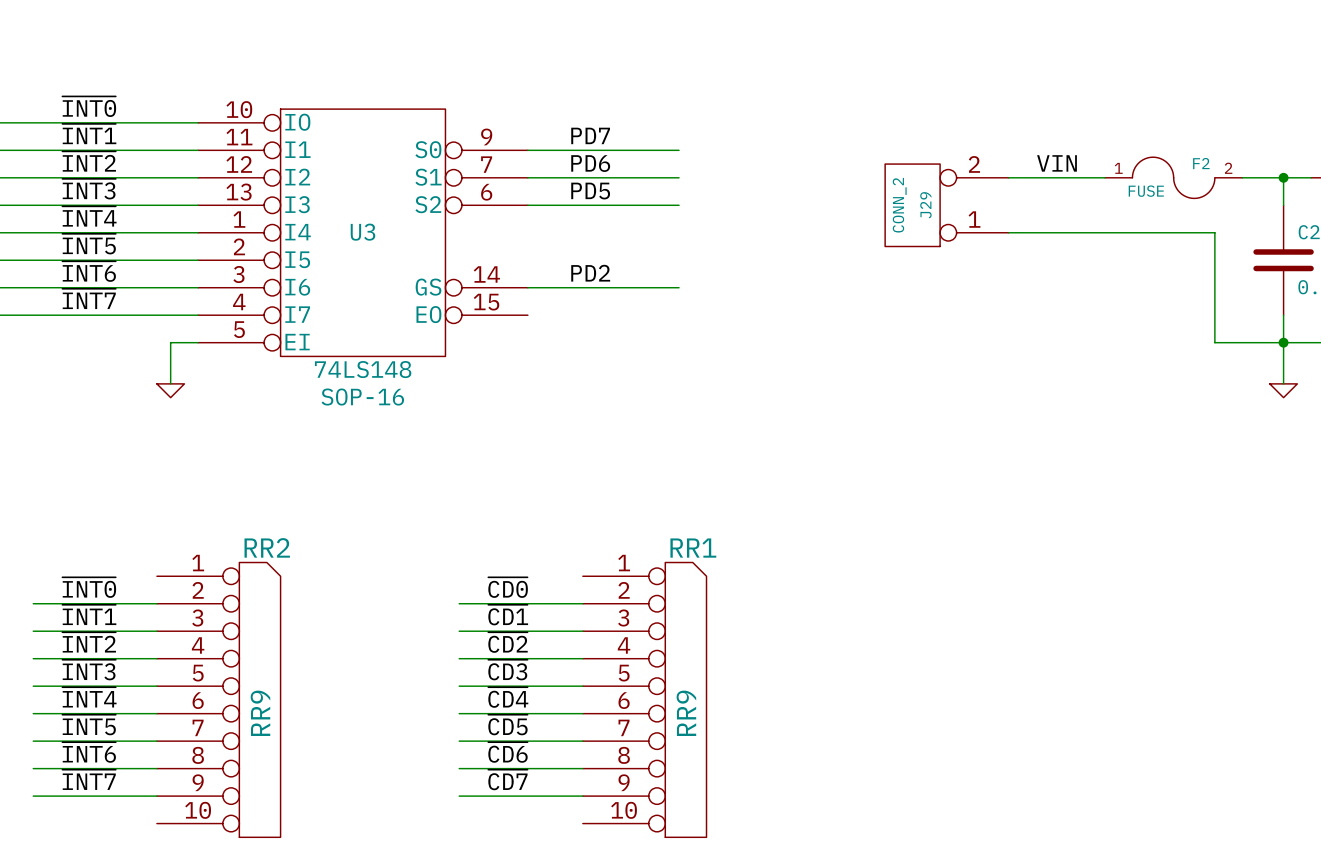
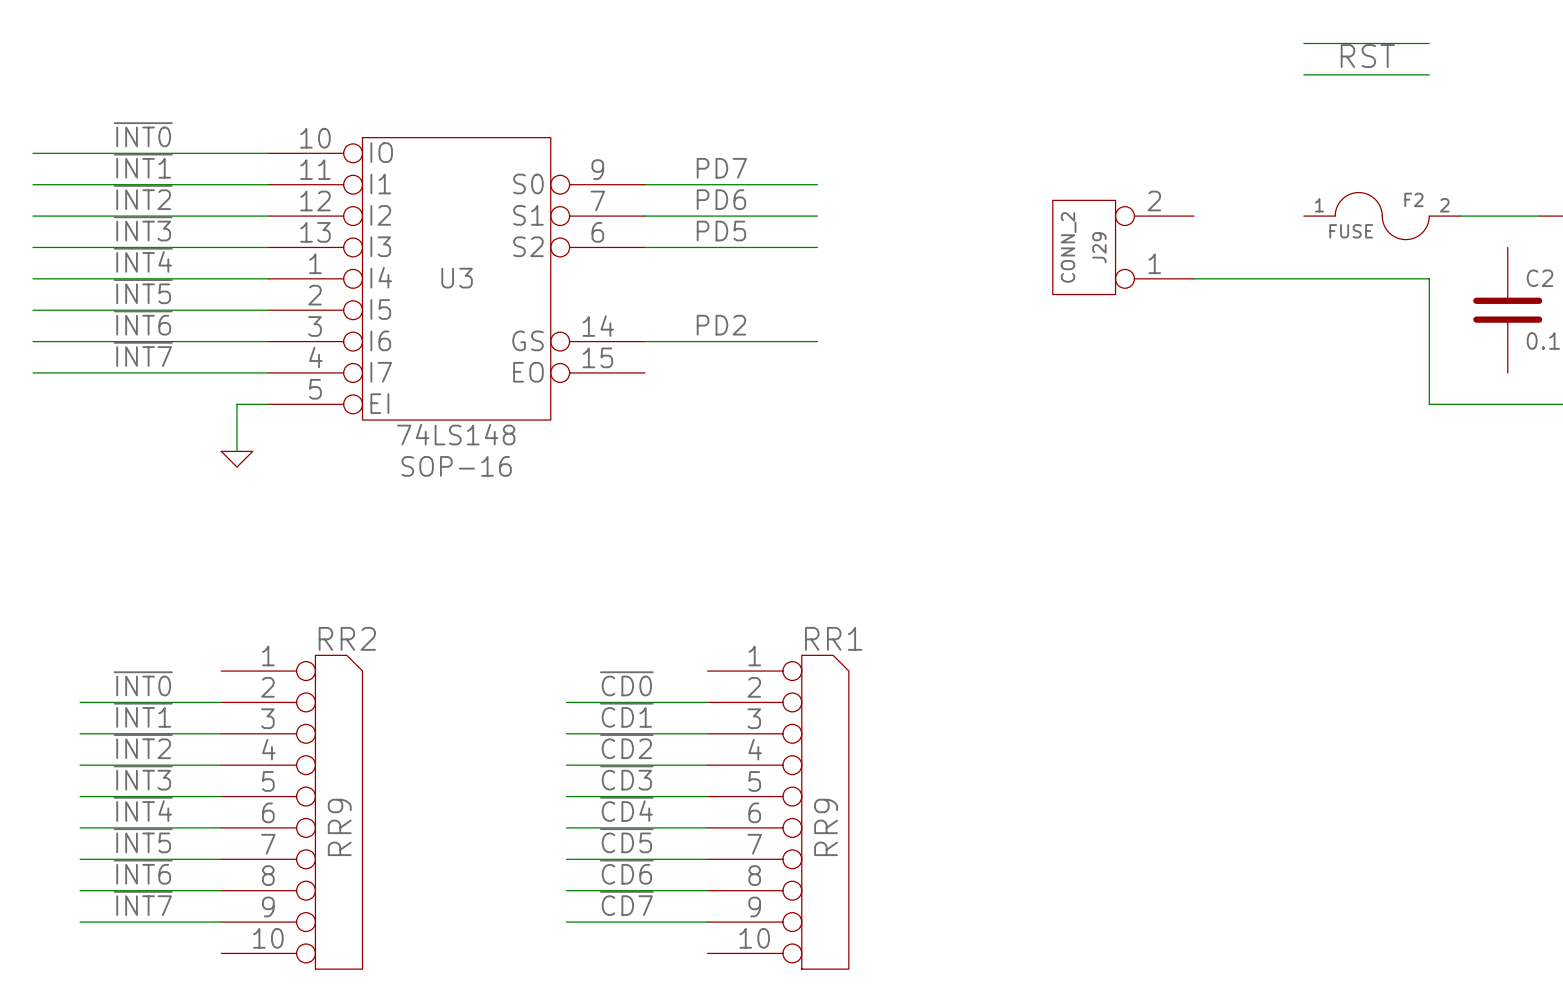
wire: none -> (1303, 43) (1429, 43)
label: none -> RST (1367, 56)
wire: none -> (1303, 74) (1429, 74)
label: VIN (1057, 163) -> none
wire: (1008, 177) (1104, 177) -> none
wire: (1283, 177) (1283, 205) -> none
junction: (1283, 177) -> none
wire: (1283, 315) (1283, 383) -> none
junction: (1283, 342) -> none
power symbol: (1283, 390) -> none

